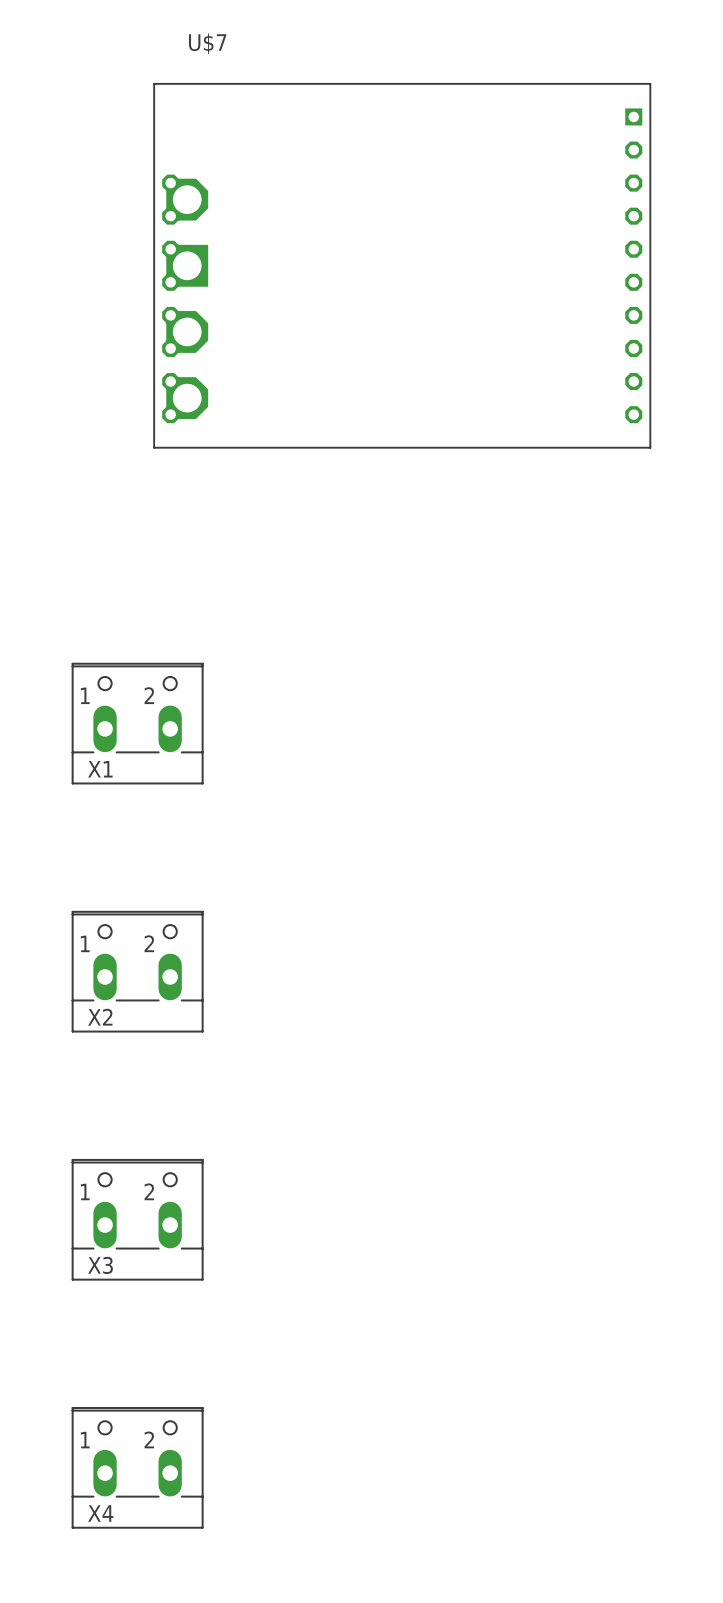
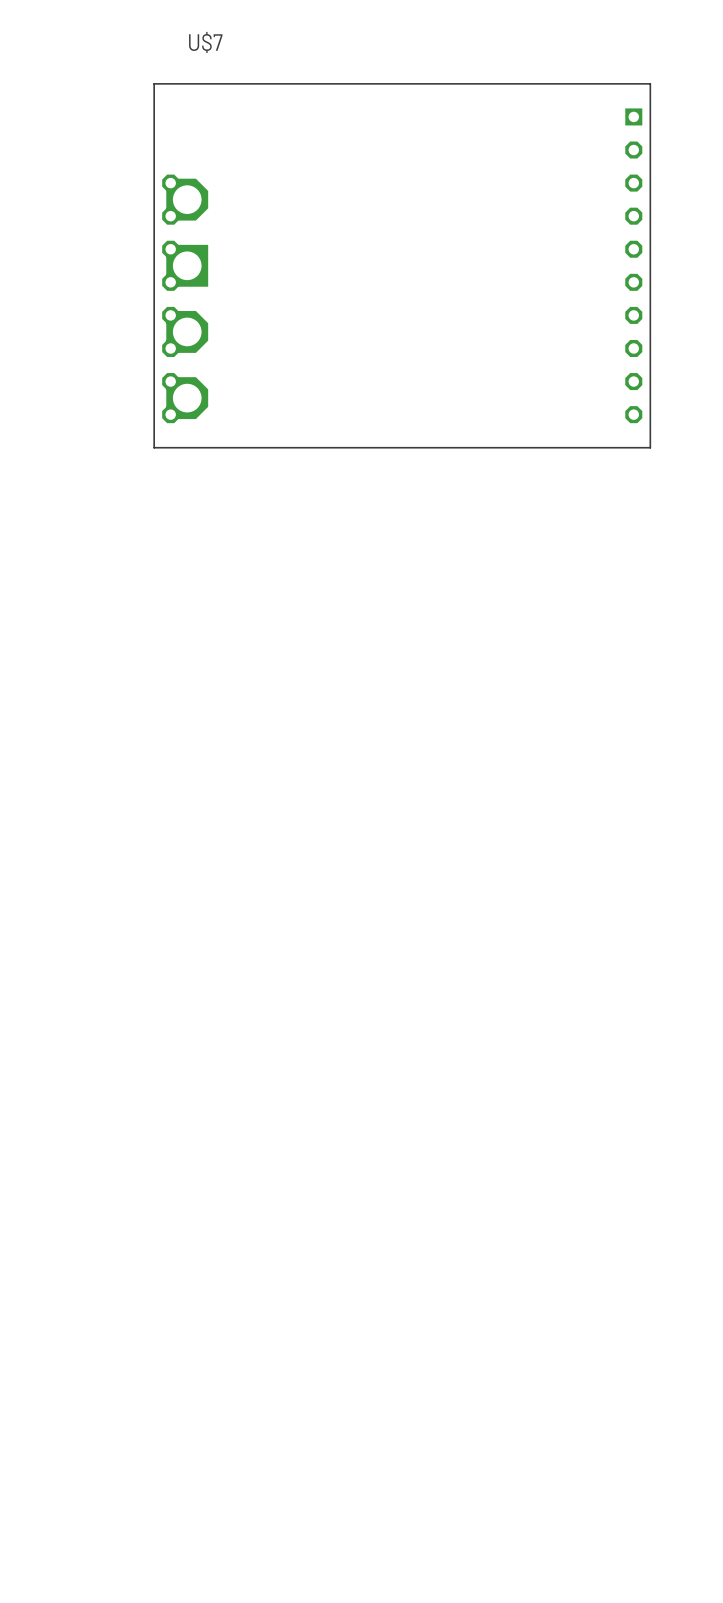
X1: (137, 723) -> none
X2: (137, 971) -> none
X3: (137, 1219) -> none
X4: (137, 1467) -> none

